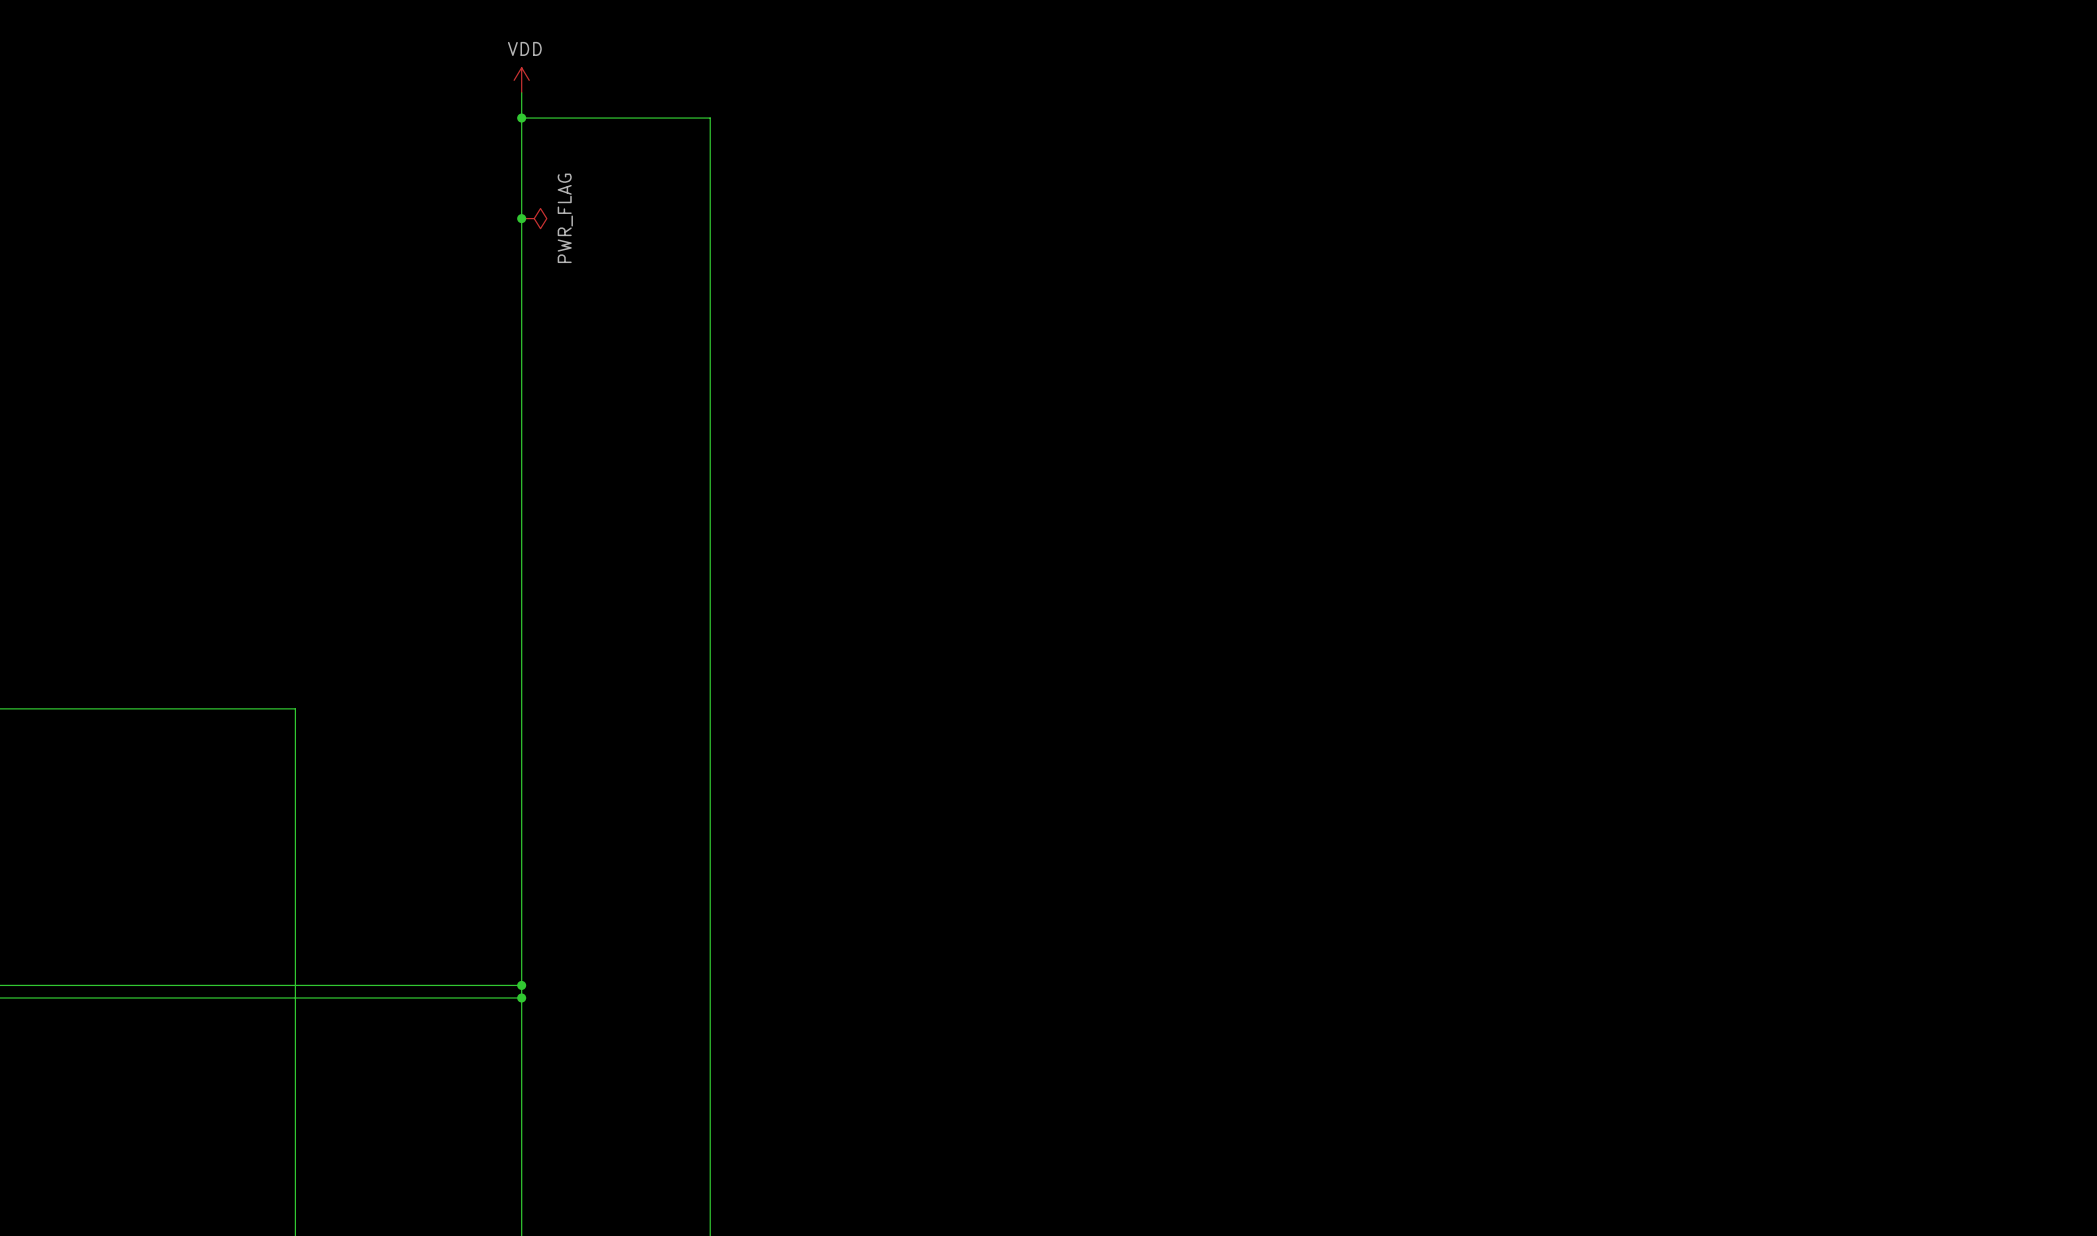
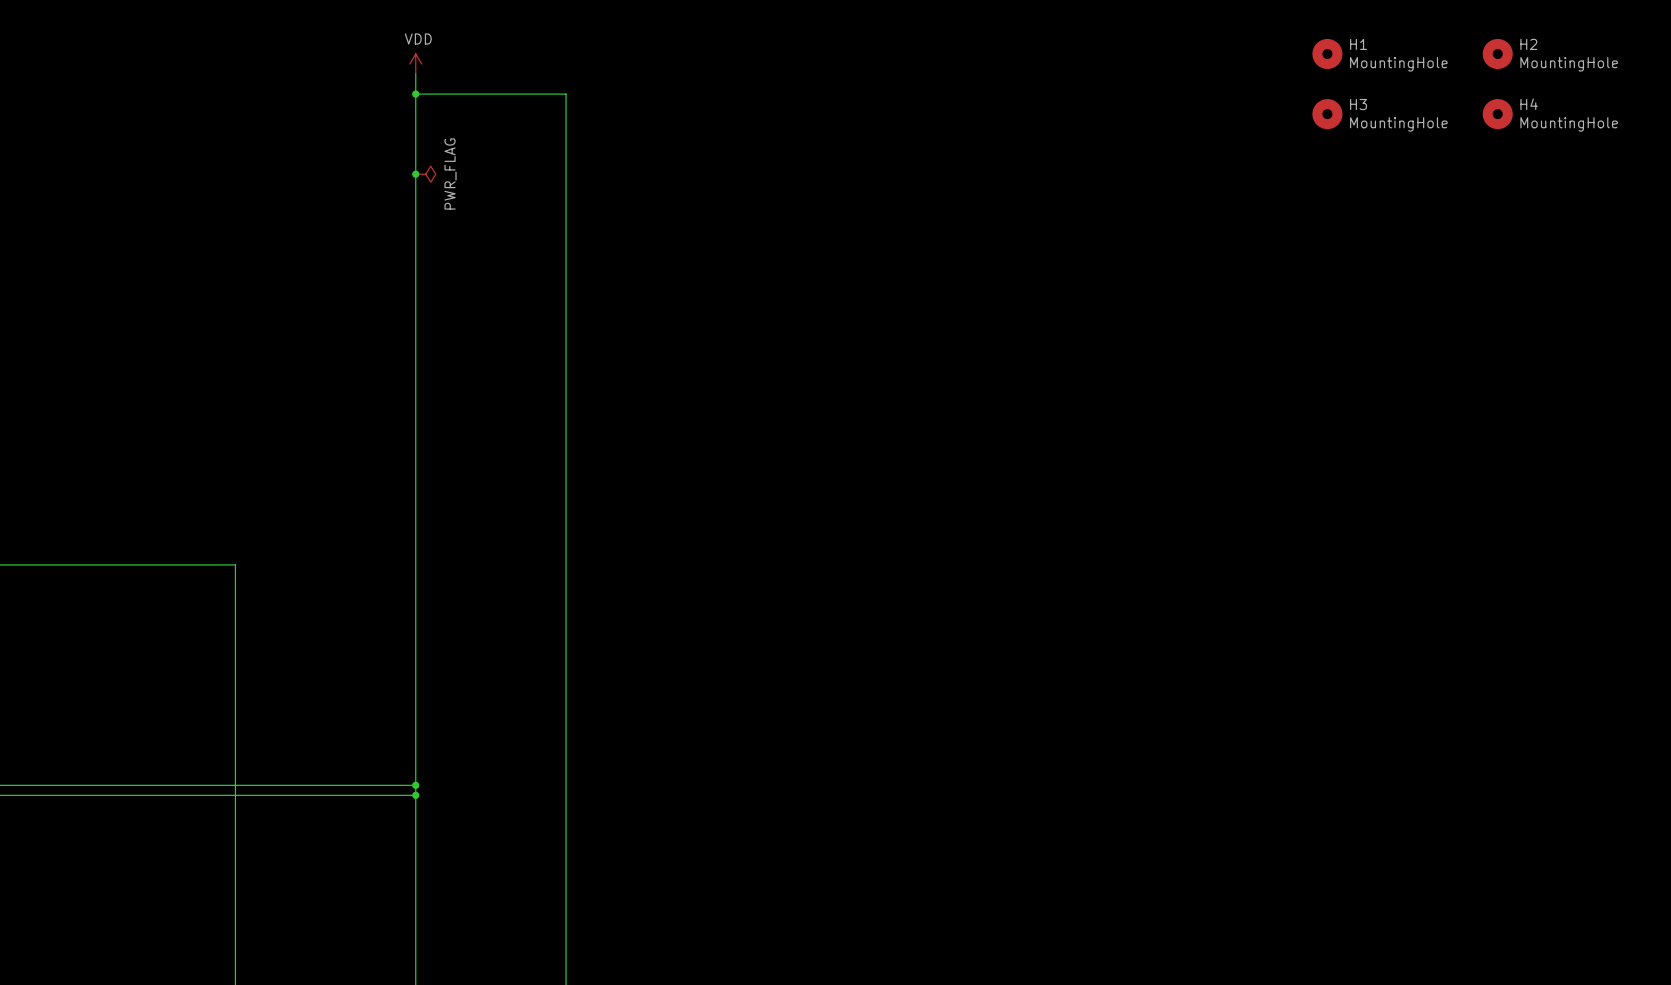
H1: none -> MountingHole (1327, 53)
H2: none -> MountingHole (1497, 53)
H3: none -> MountingHole (1327, 114)
H4: none -> MountingHole (1497, 114)

